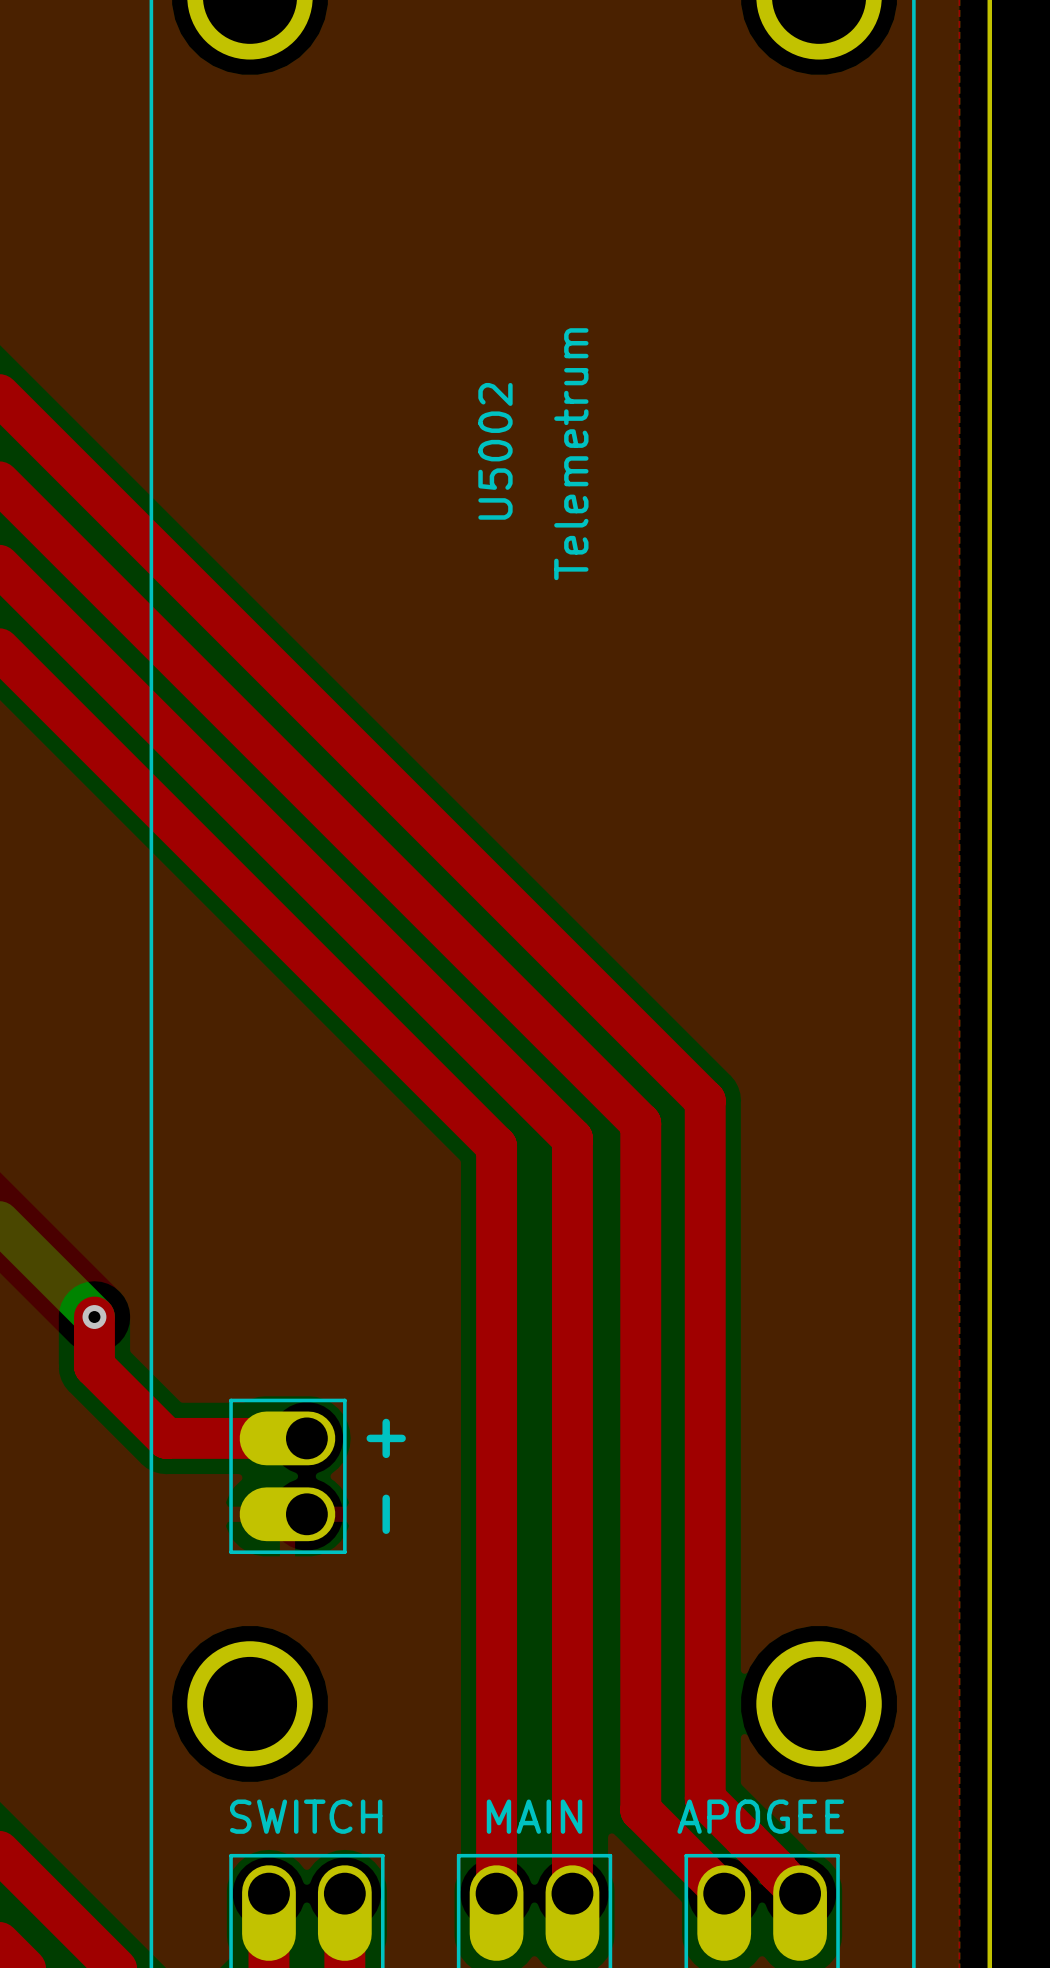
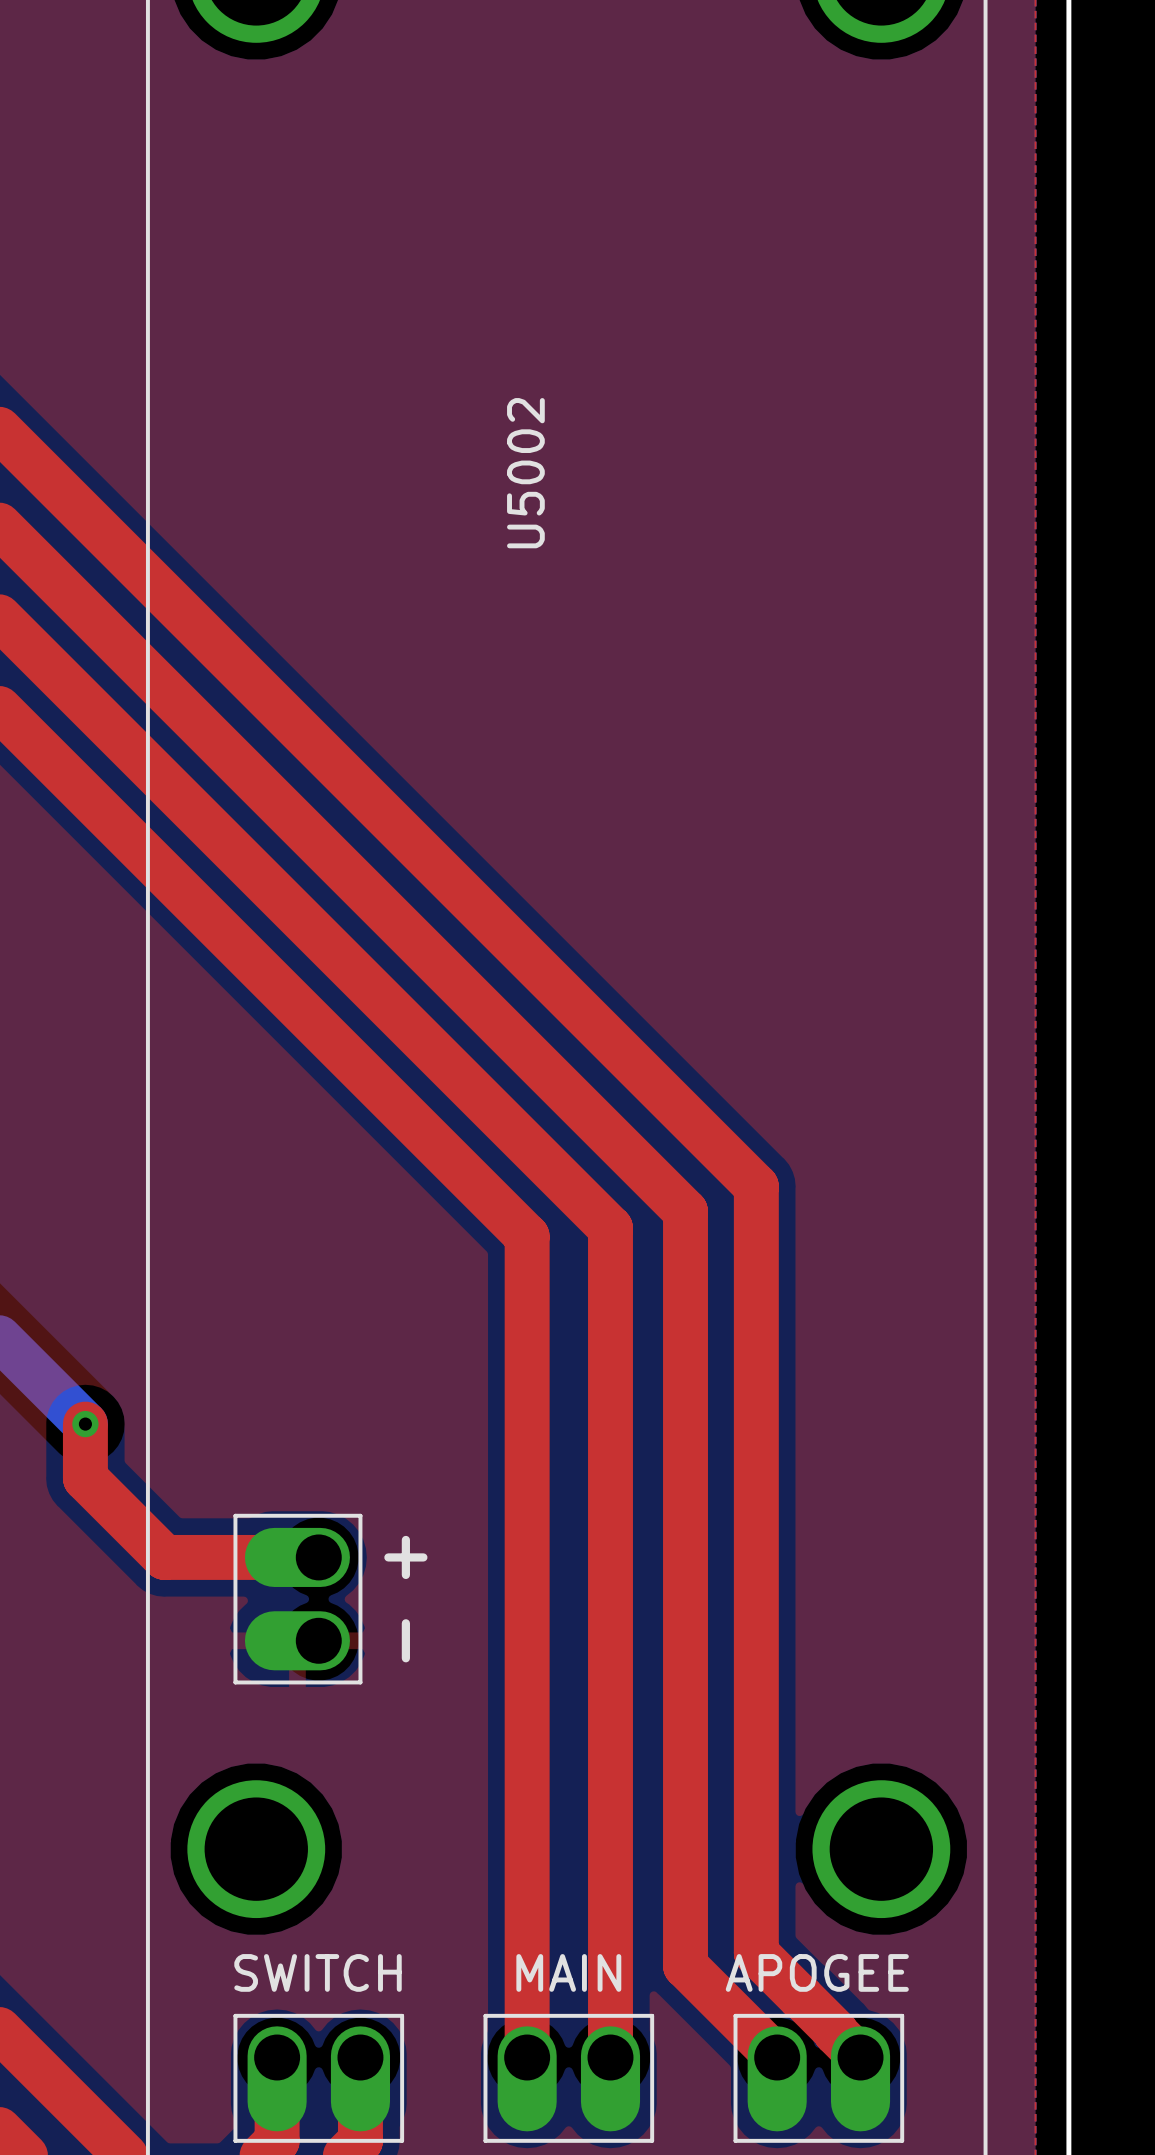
U5002 value: Telemetrum (571, 454) -> none

